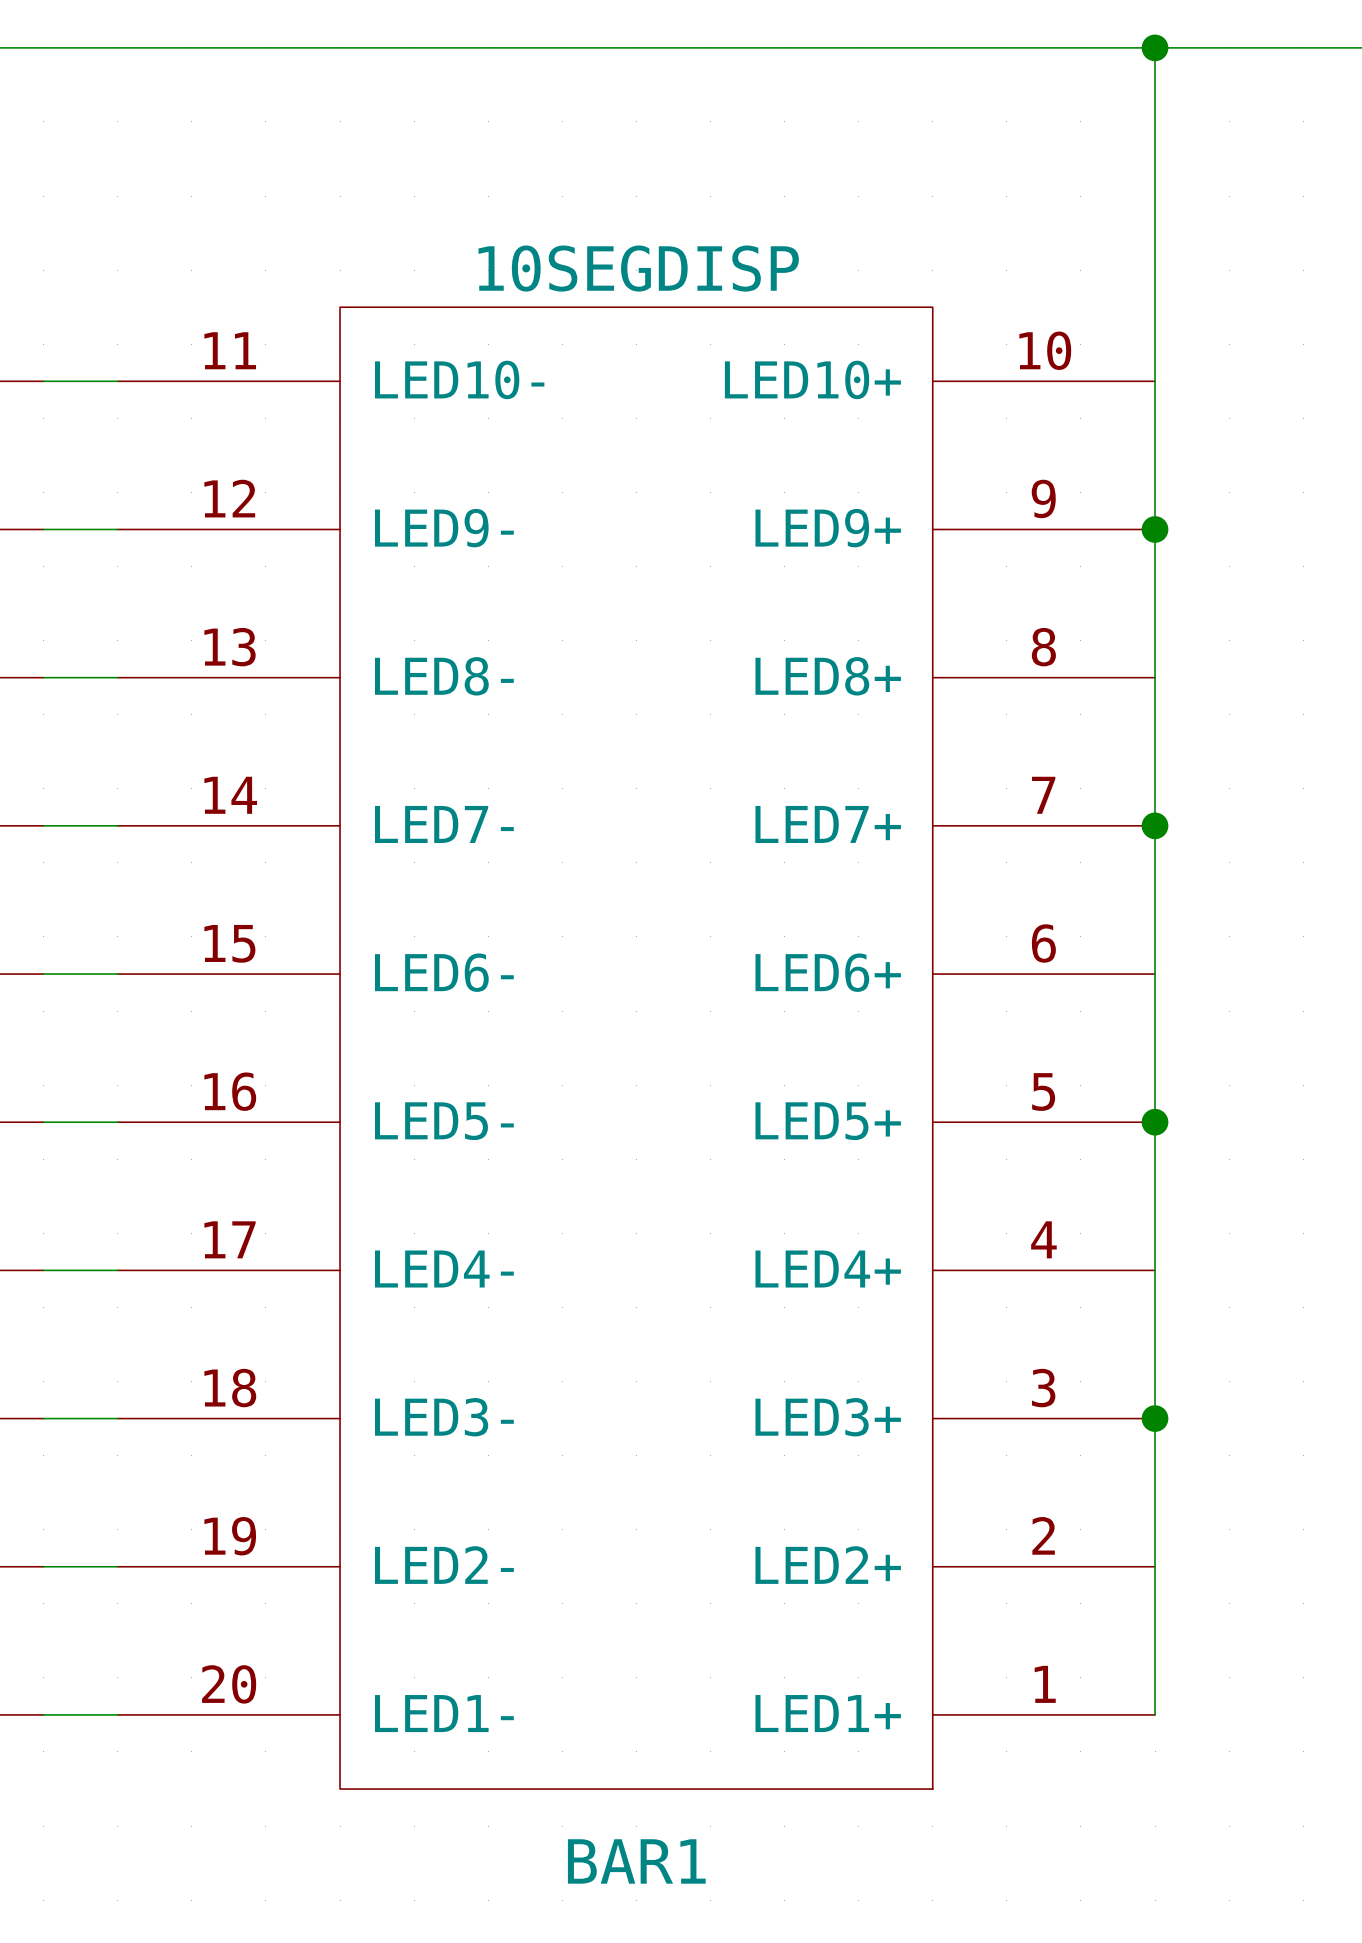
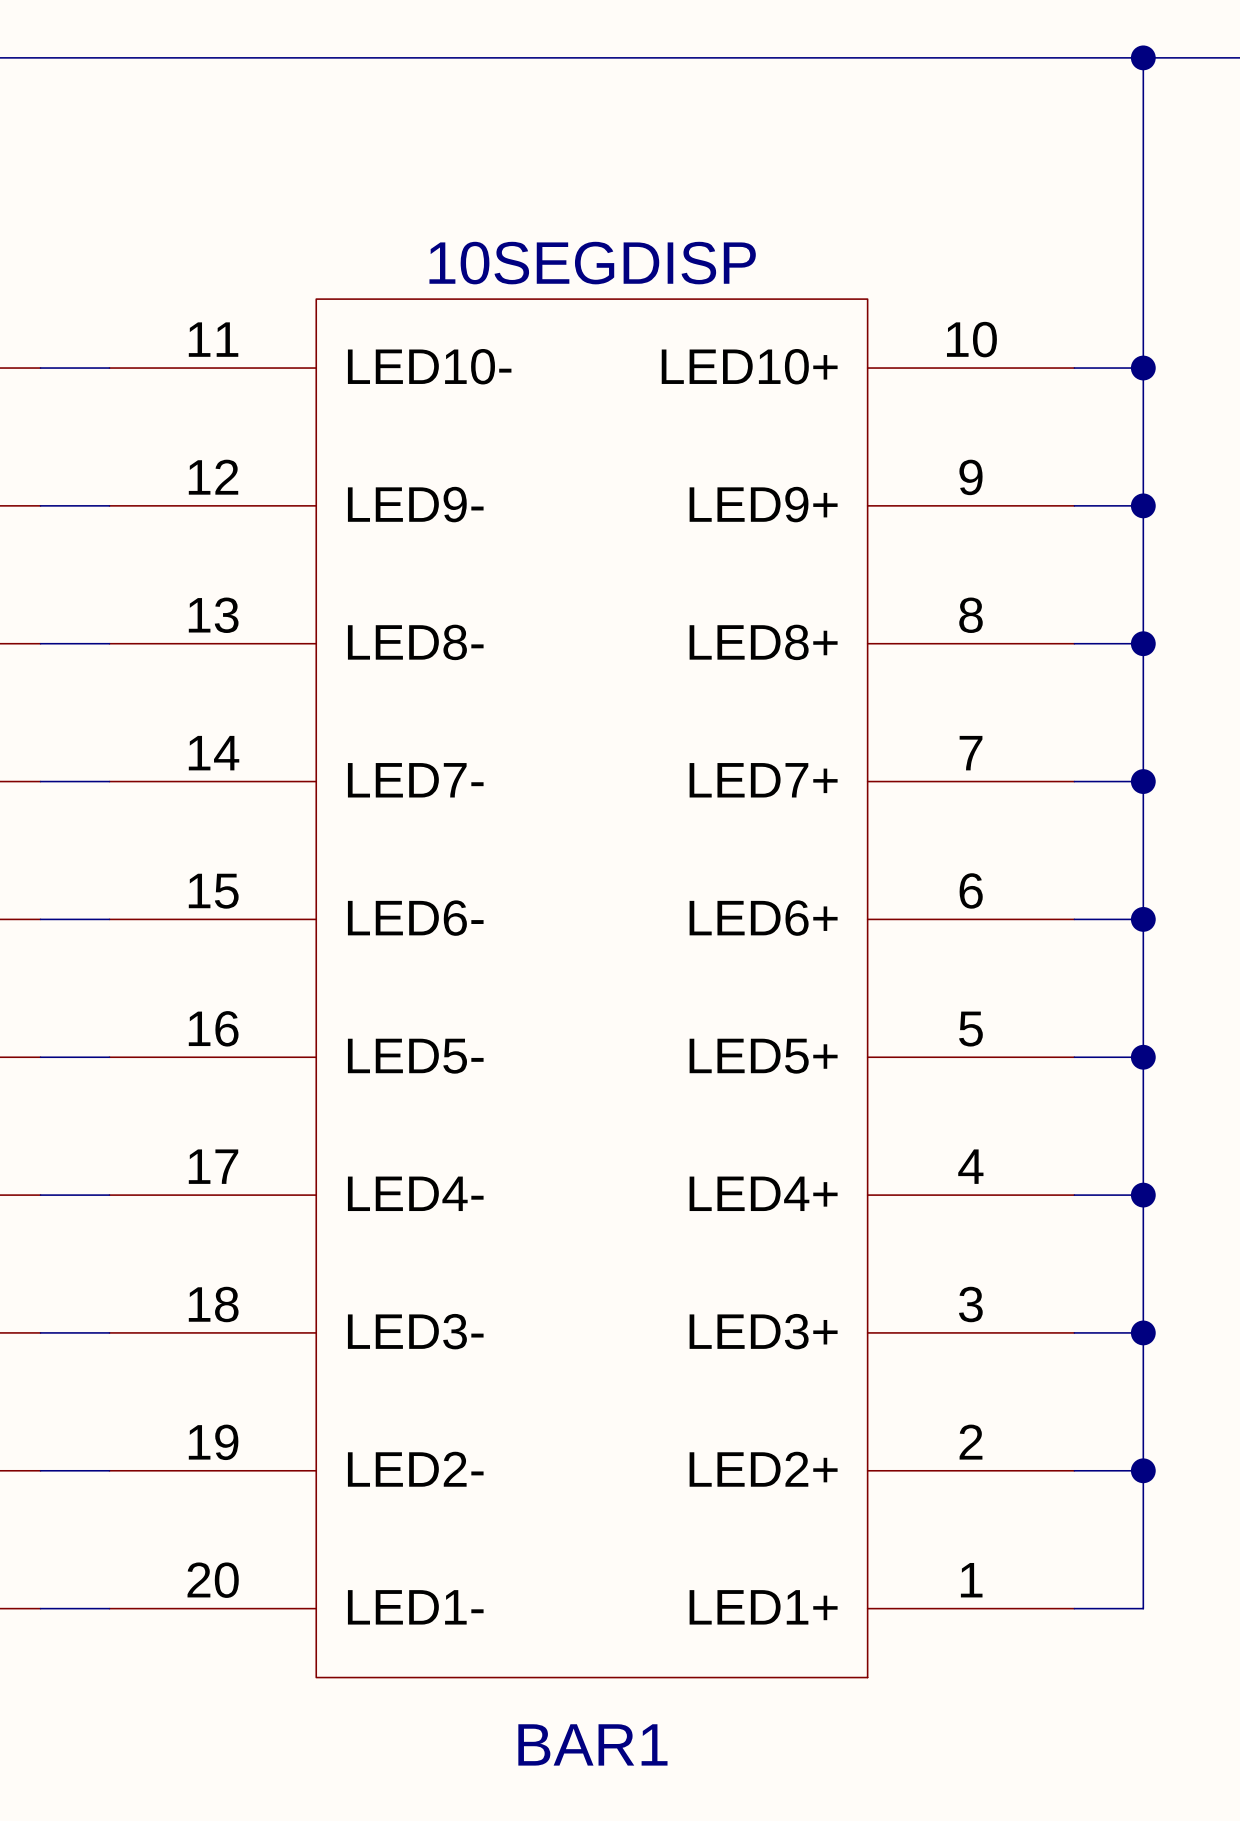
wire: (1155, 47) (1155, 1714) -> (1143, 57) (1143, 1608) (1074, 1608)
junction position: (1155, 47) -> (1143, 57)
wire: none -> (1074, 368) (1143, 368)
junction: none -> (1143, 368)
wire: none -> (1074, 505) (1143, 505)
junction position: (1155, 529) -> (1143, 505)
wire: none -> (1074, 643) (1143, 643)
junction: none -> (1143, 643)
wire: none -> (1074, 781) (1143, 781)
junction position: (1155, 825) -> (1143, 781)
wire: none -> (1074, 919) (1143, 919)
junction: none -> (1143, 919)
wire: none -> (1074, 1057) (1143, 1057)
junction position: (1155, 1122) -> (1143, 1057)
wire: none -> (1074, 1195) (1143, 1195)
junction: none -> (1143, 1195)
wire: none -> (1074, 1332) (1143, 1332)
junction position: (1155, 1418) -> (1143, 1332)
wire: none -> (1074, 1470) (1143, 1470)
junction: none -> (1143, 1470)

